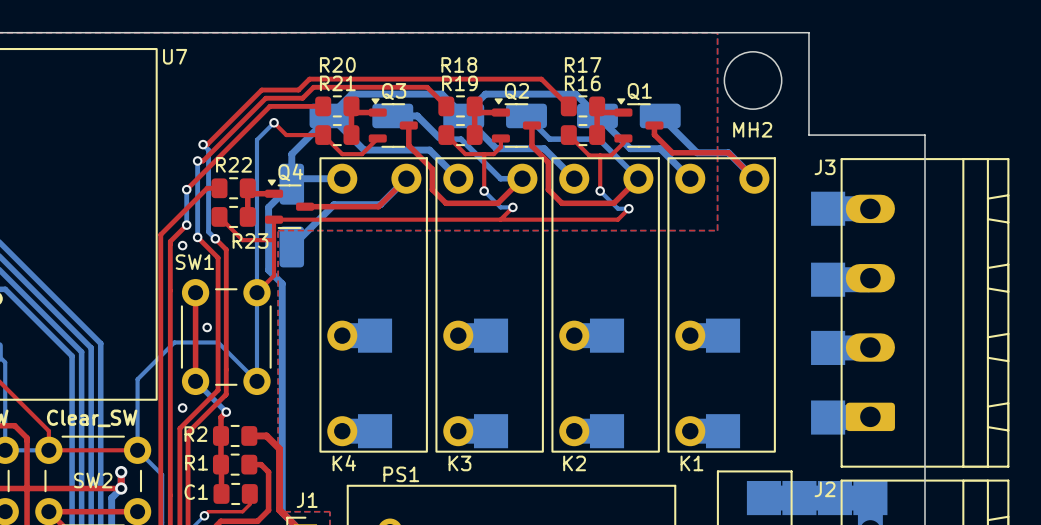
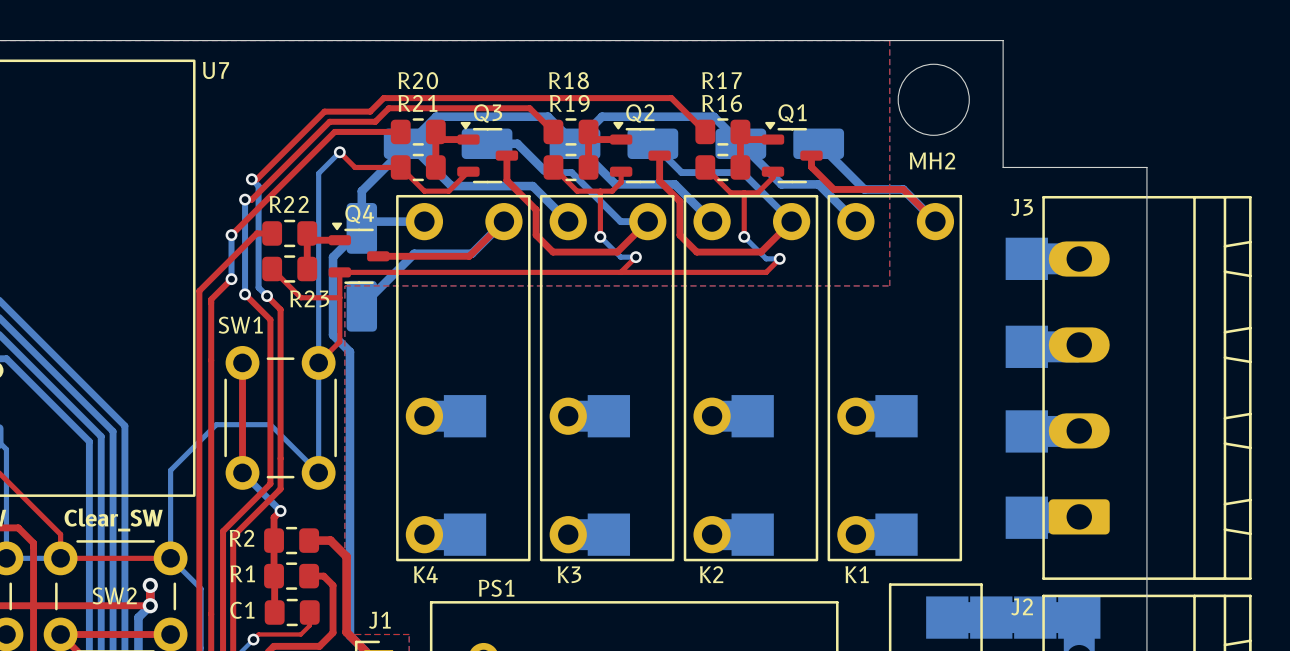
via: (182, 245) -> none
via: (207, 327) -> none
via: (182, 407) -> none

